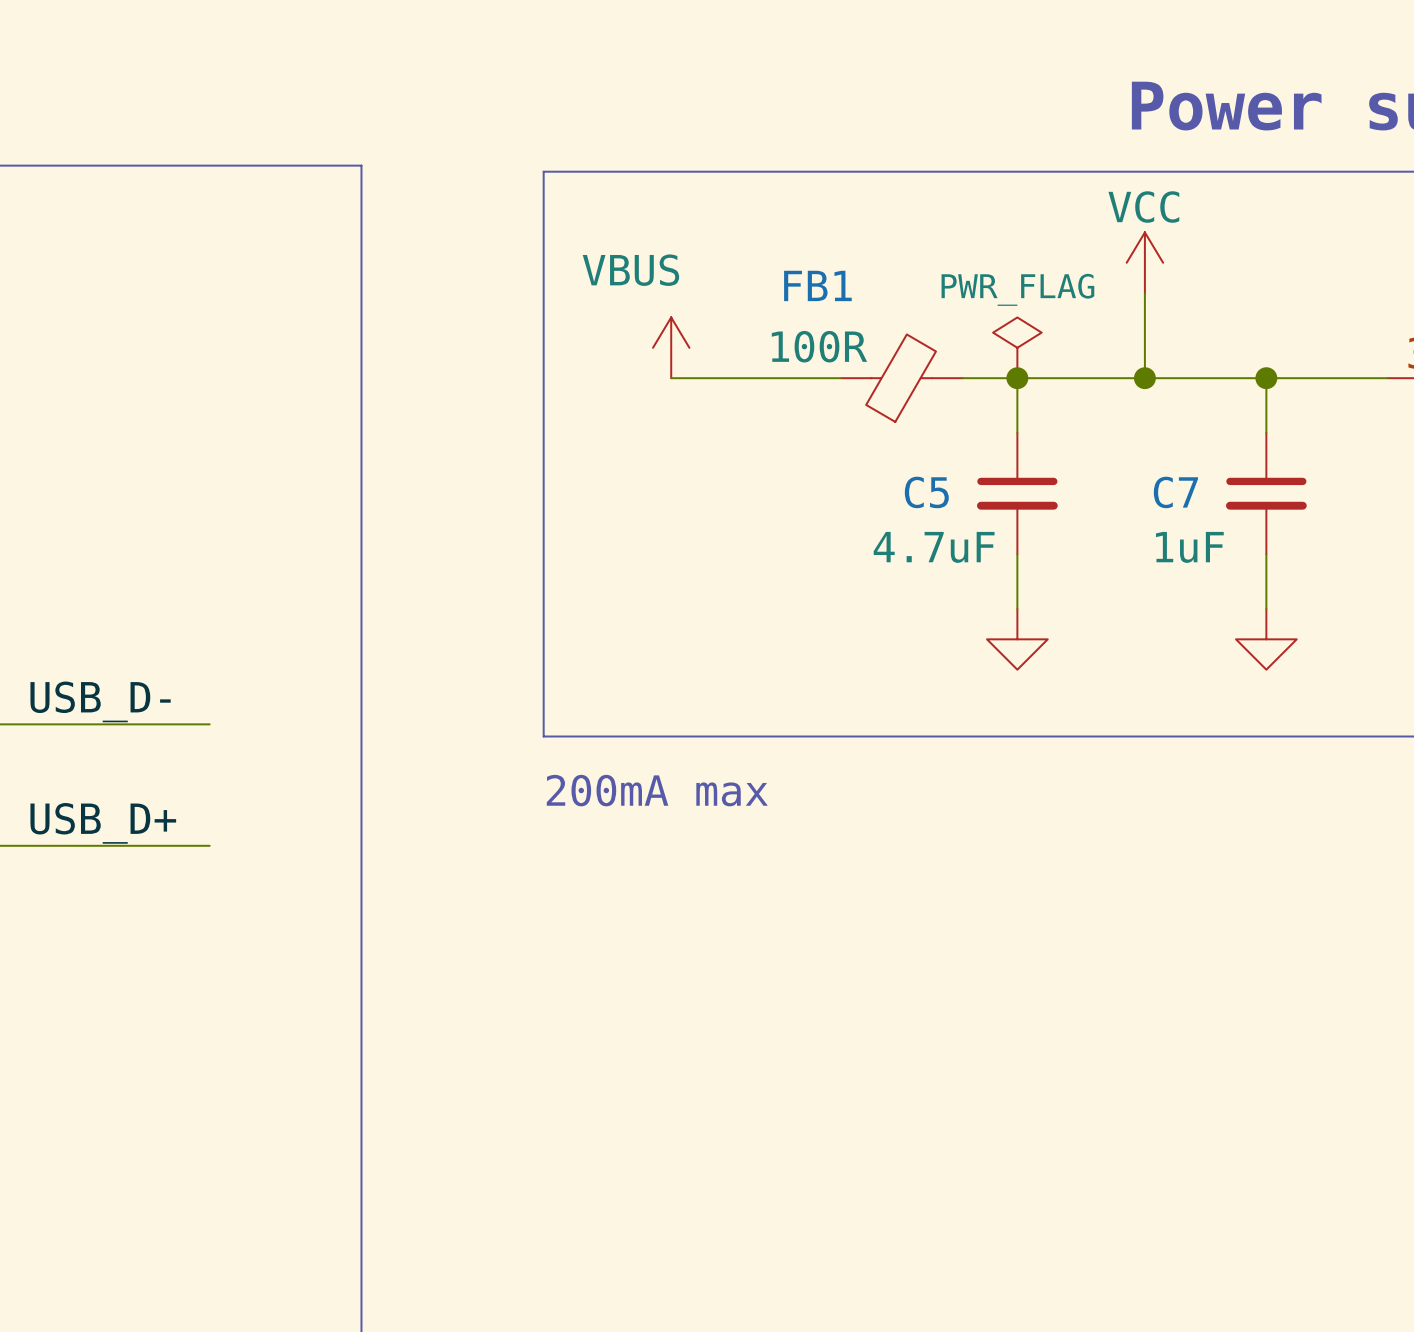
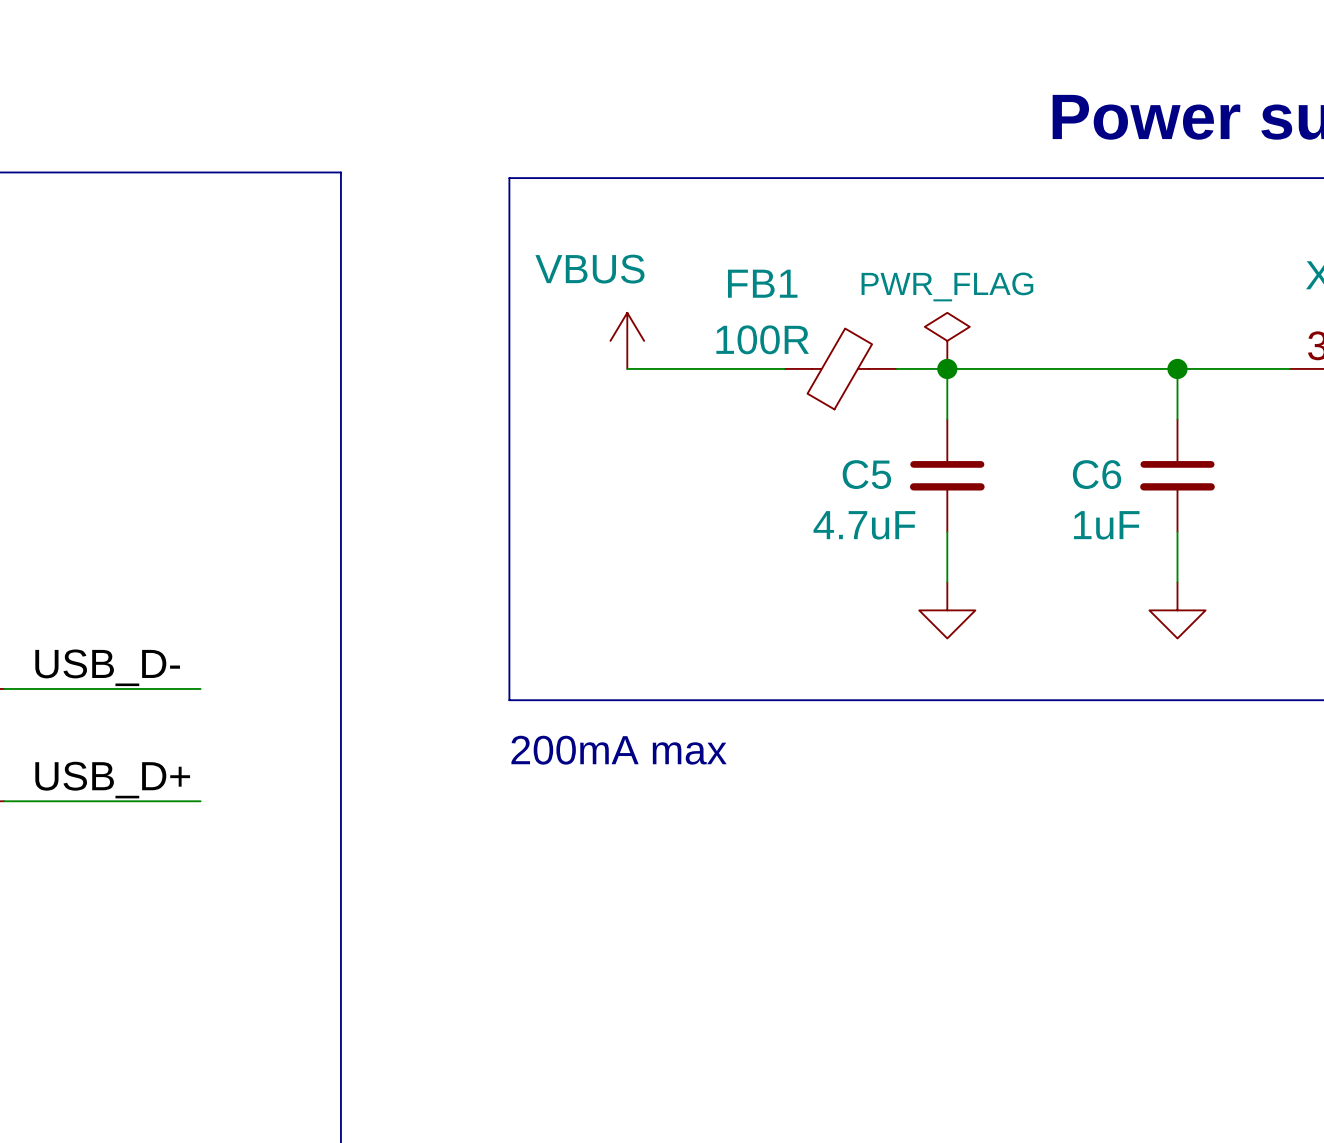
power symbol: VCC (1144, 262) -> none
wire: (1144, 293) (1144, 378) -> none
junction: (1144, 378) -> none
C7 name: C7 (1175, 492) -> C6 (1097, 474)

